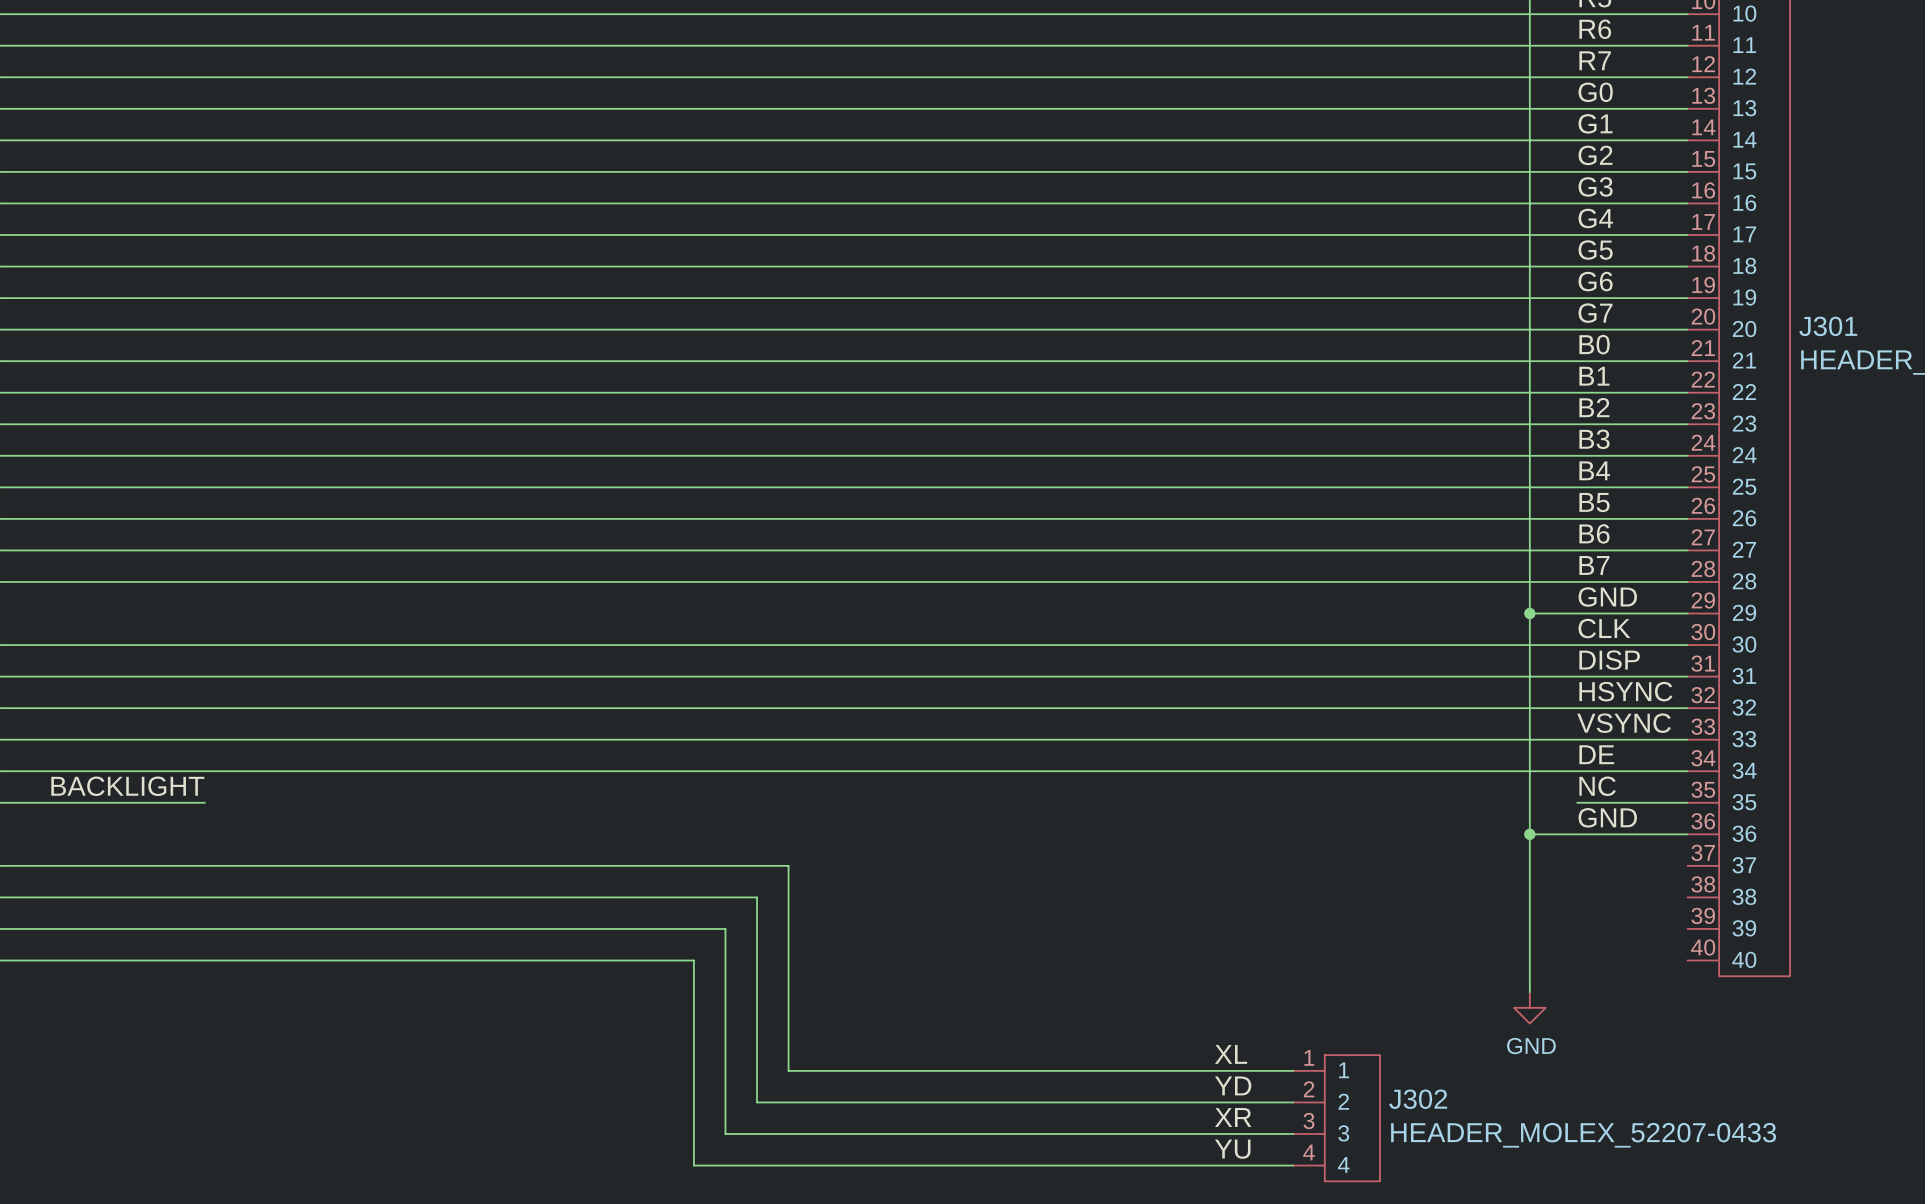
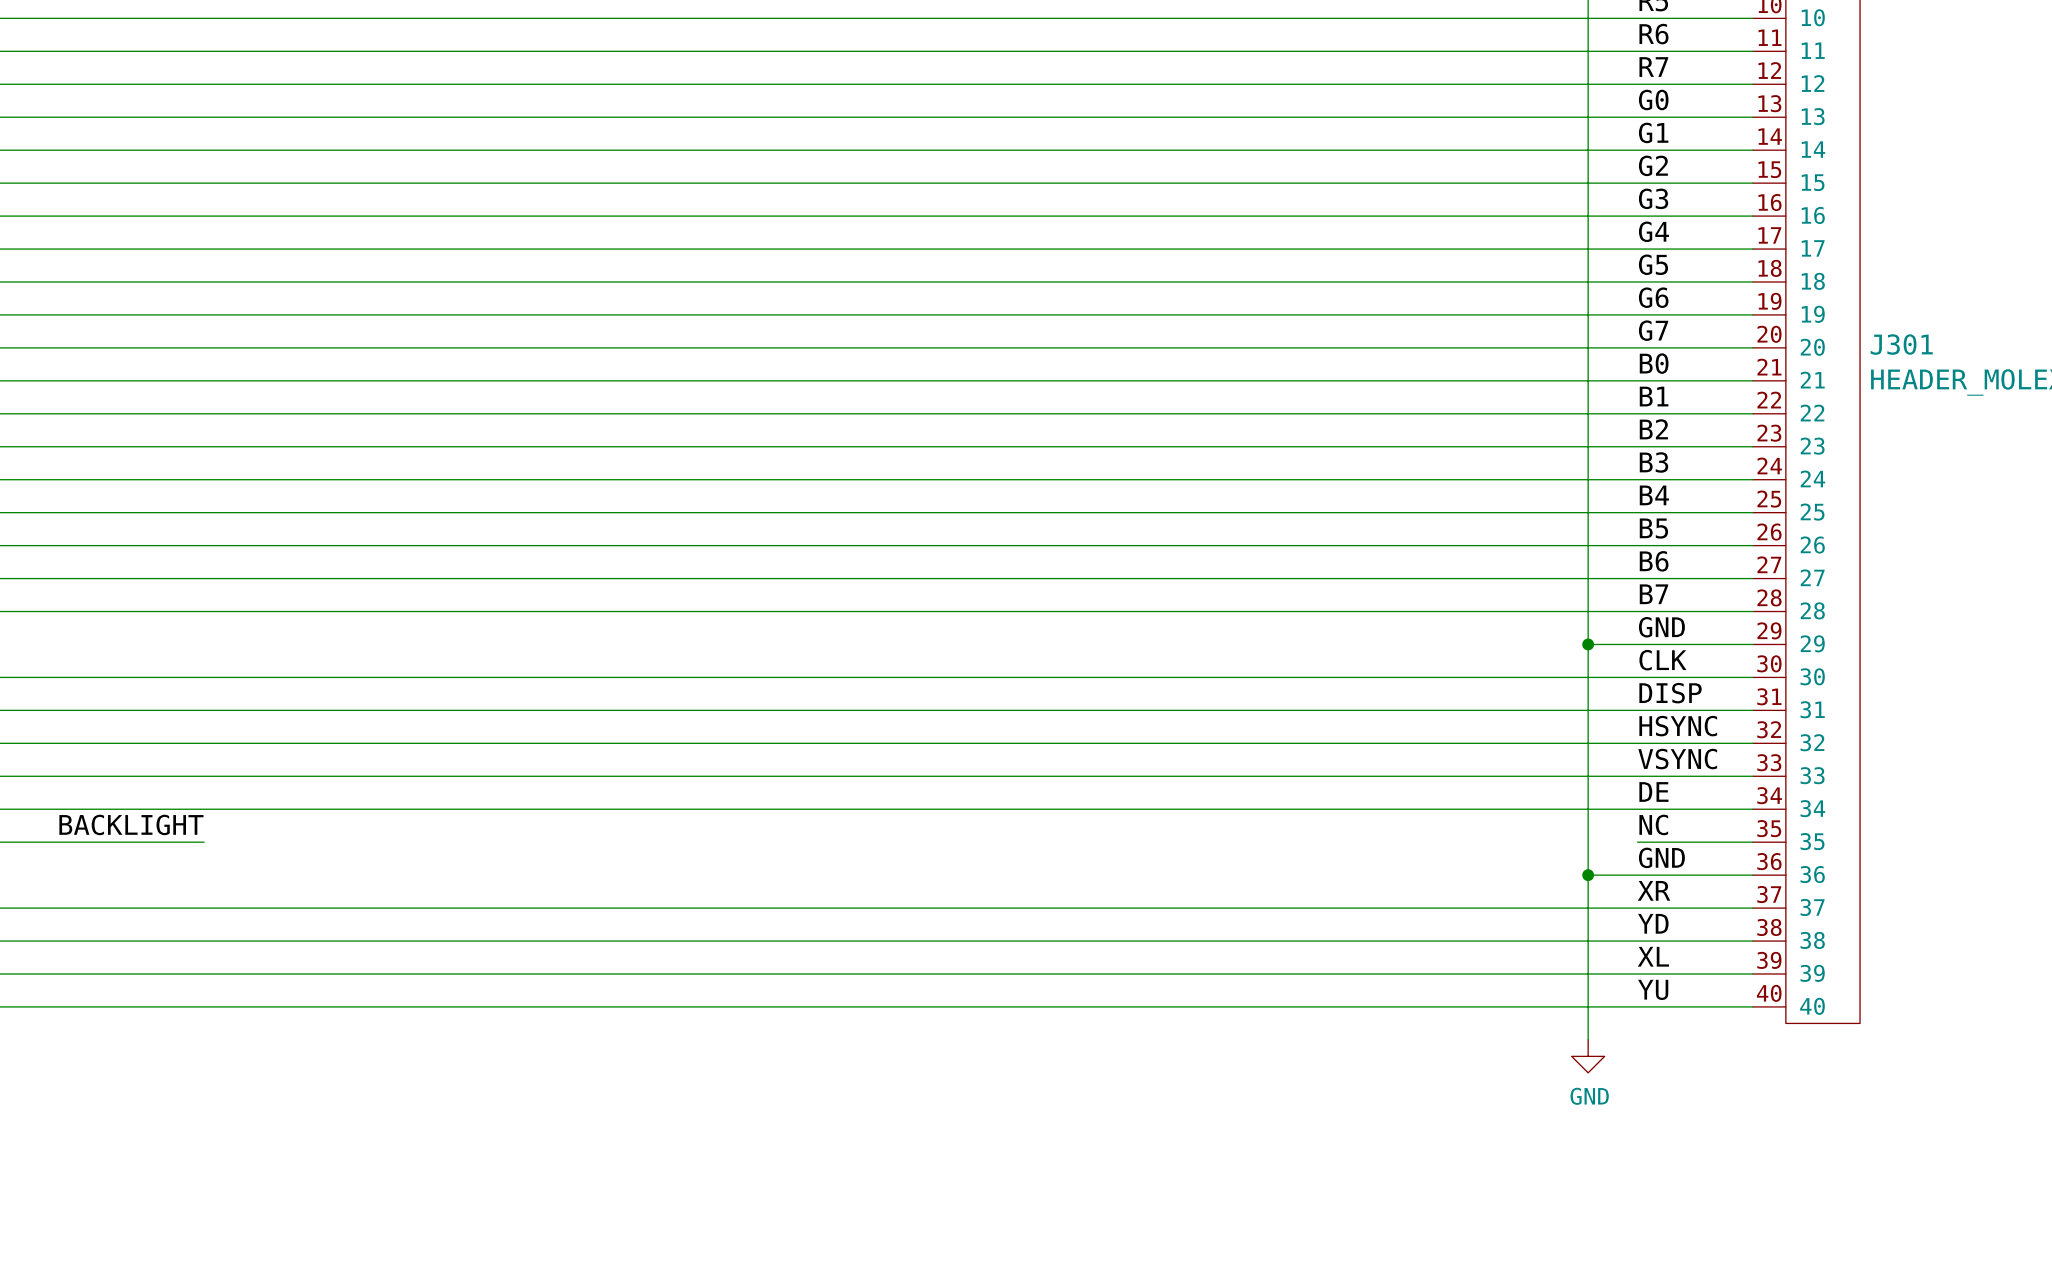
label: none -> XR (1654, 890)
wire: (788, 865) (788, 1070) (1293, 1070) -> (813, 908) (1752, 908)
label: none -> YD (1653, 923)
wire: (757, 897) (757, 1102) (1293, 1102) -> (780, 941) (1752, 941)
label: none -> XL (1653, 956)
wire: (725, 928) (725, 1134) (1293, 1134) -> (747, 973) (1752, 973)
label: none -> YU (1653, 989)
wire: (693, 960) (693, 1165) (1293, 1165) -> (714, 1006) (1752, 1006)
label: XL (1231, 1054) -> none
label: YD (1233, 1085) -> none
label: XR (1233, 1117) -> none
J302: HEADER_MOLEX_52207-0433 (1336, 1118) -> none
label: YU (1232, 1149) -> none

